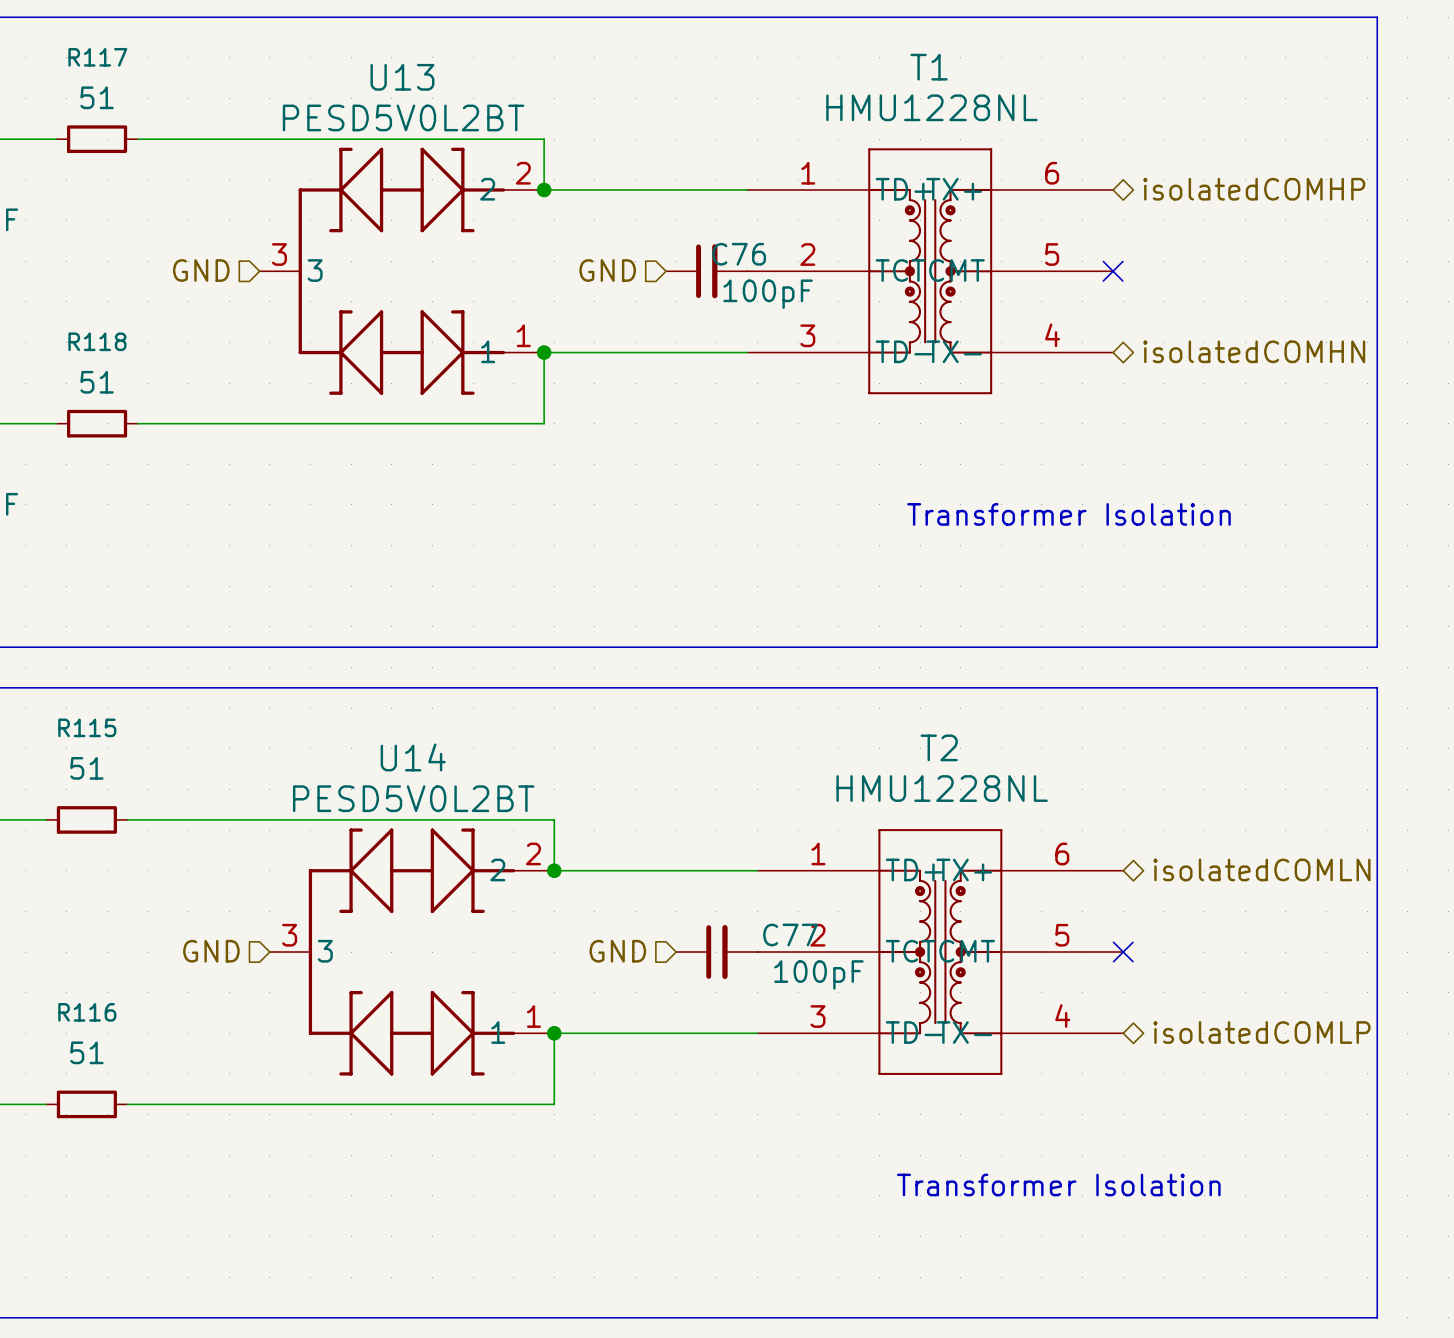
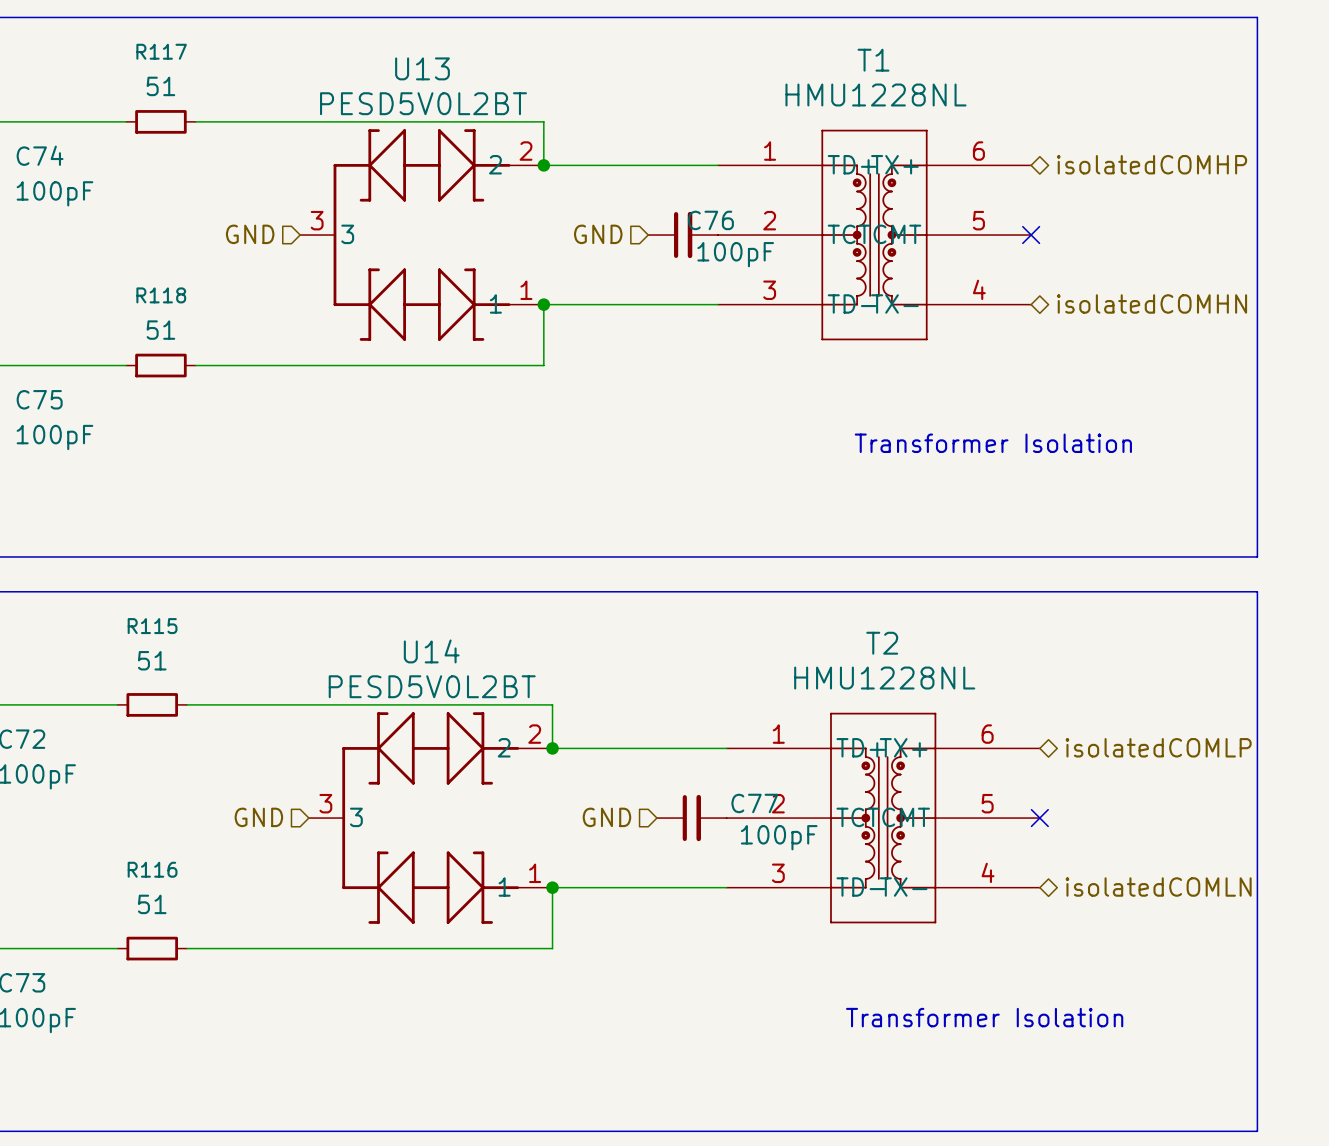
hierarchical label: isolatedCOMLN (1261, 869) -> isolatedCOMLP (1158, 747)
hierarchical label: isolatedCOMLP (1261, 1032) -> isolatedCOMLN (1158, 887)

